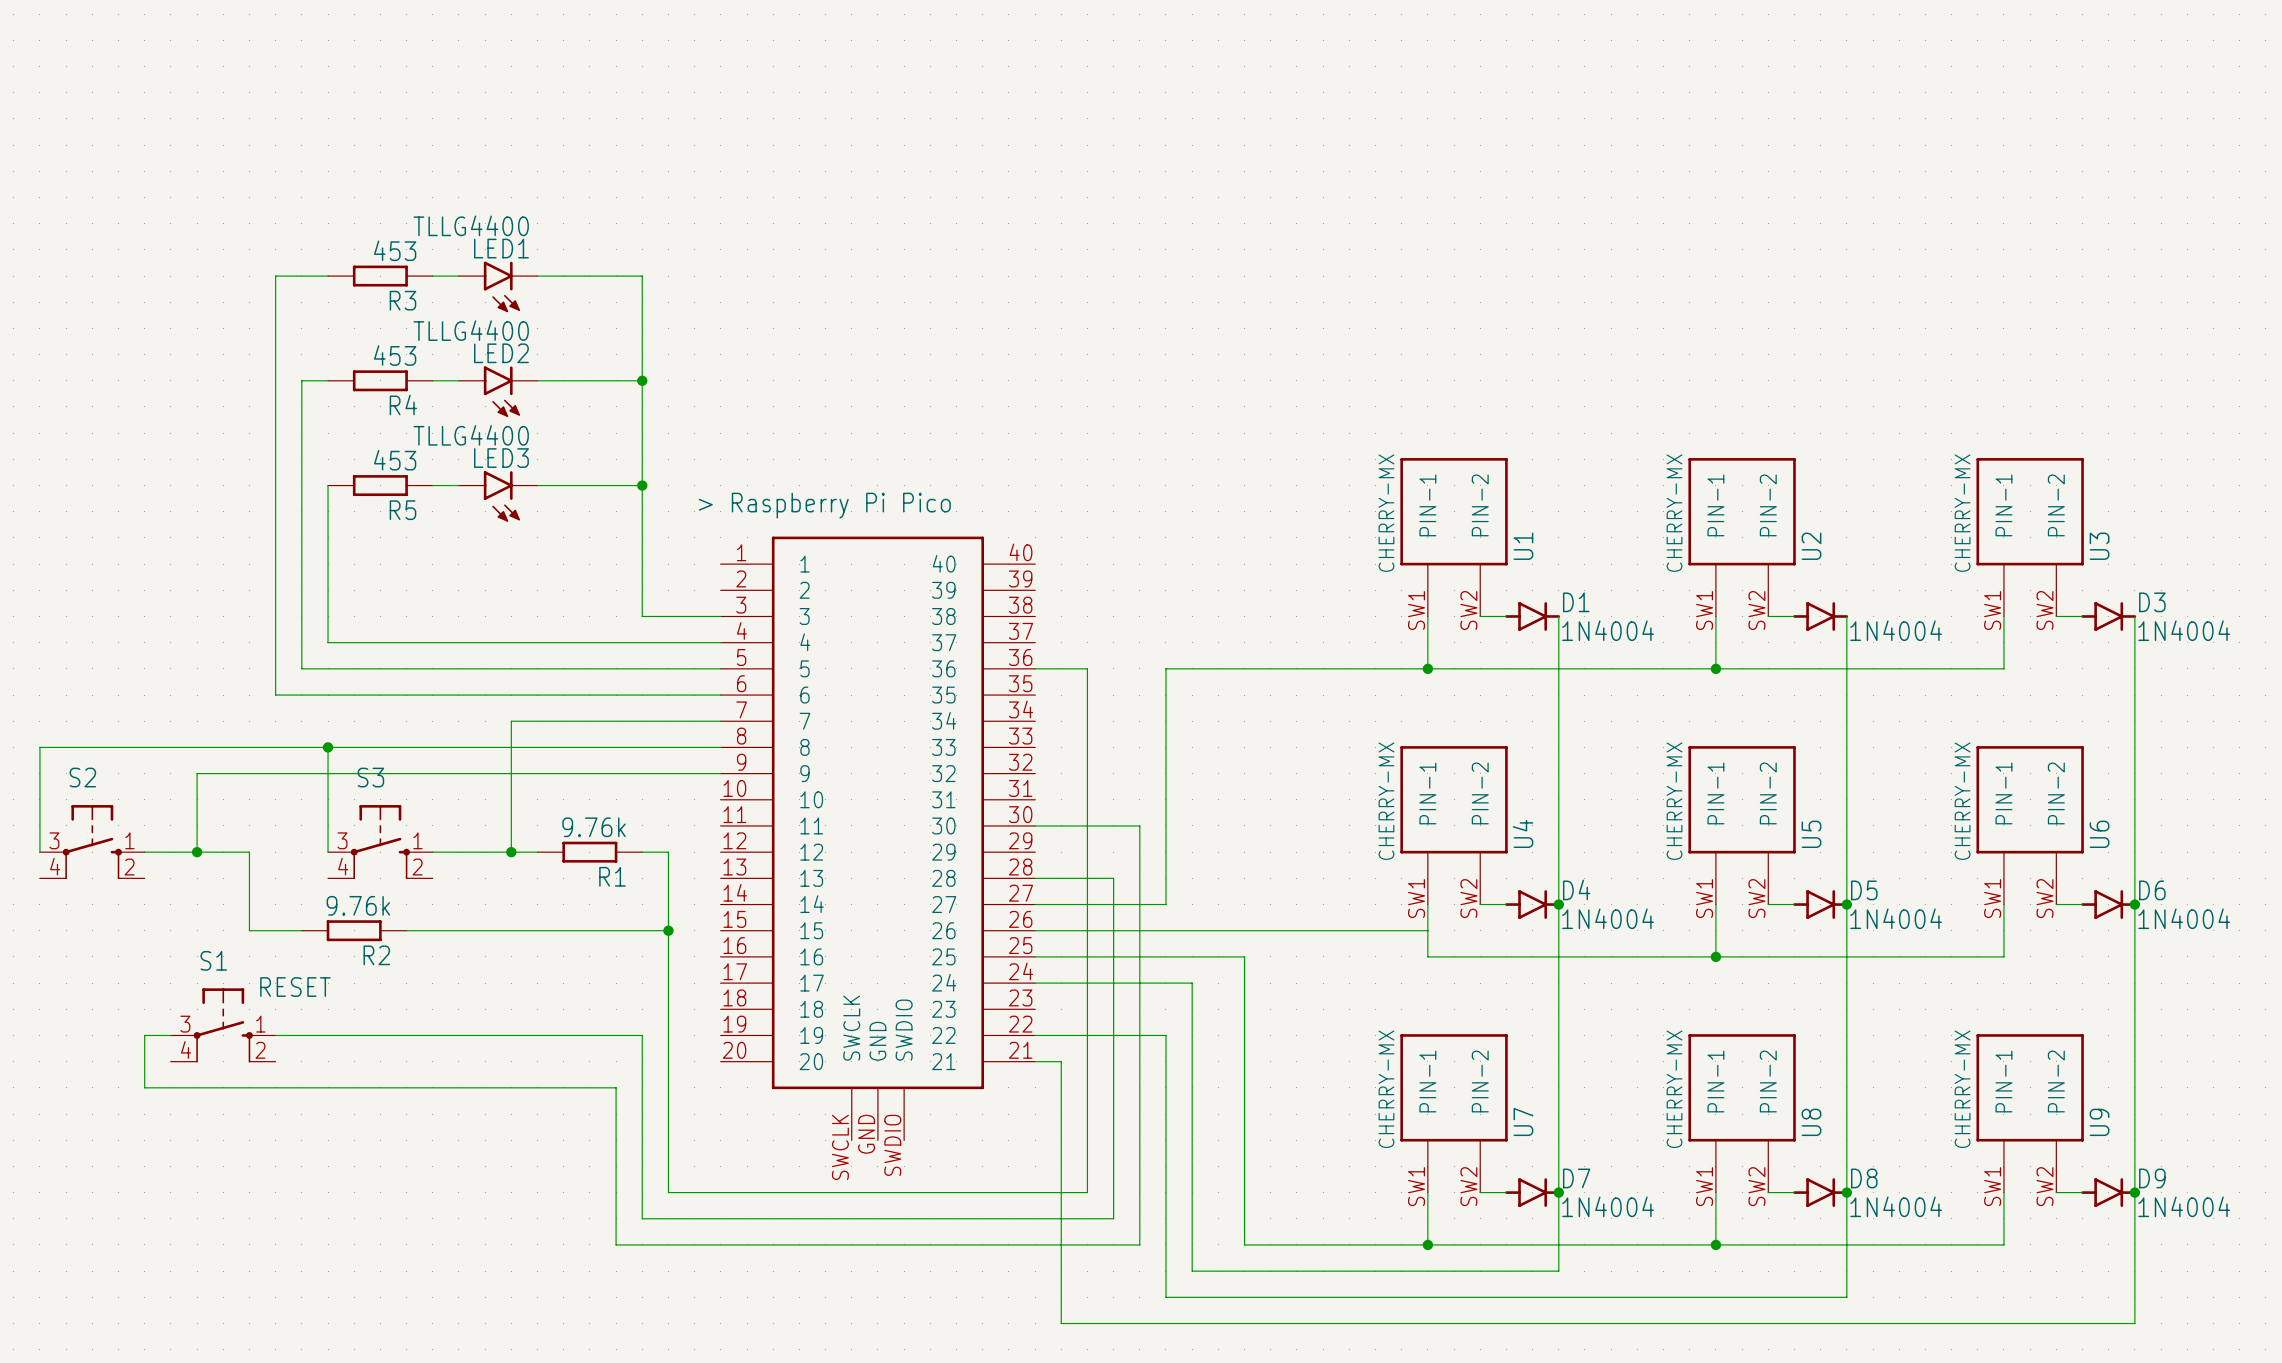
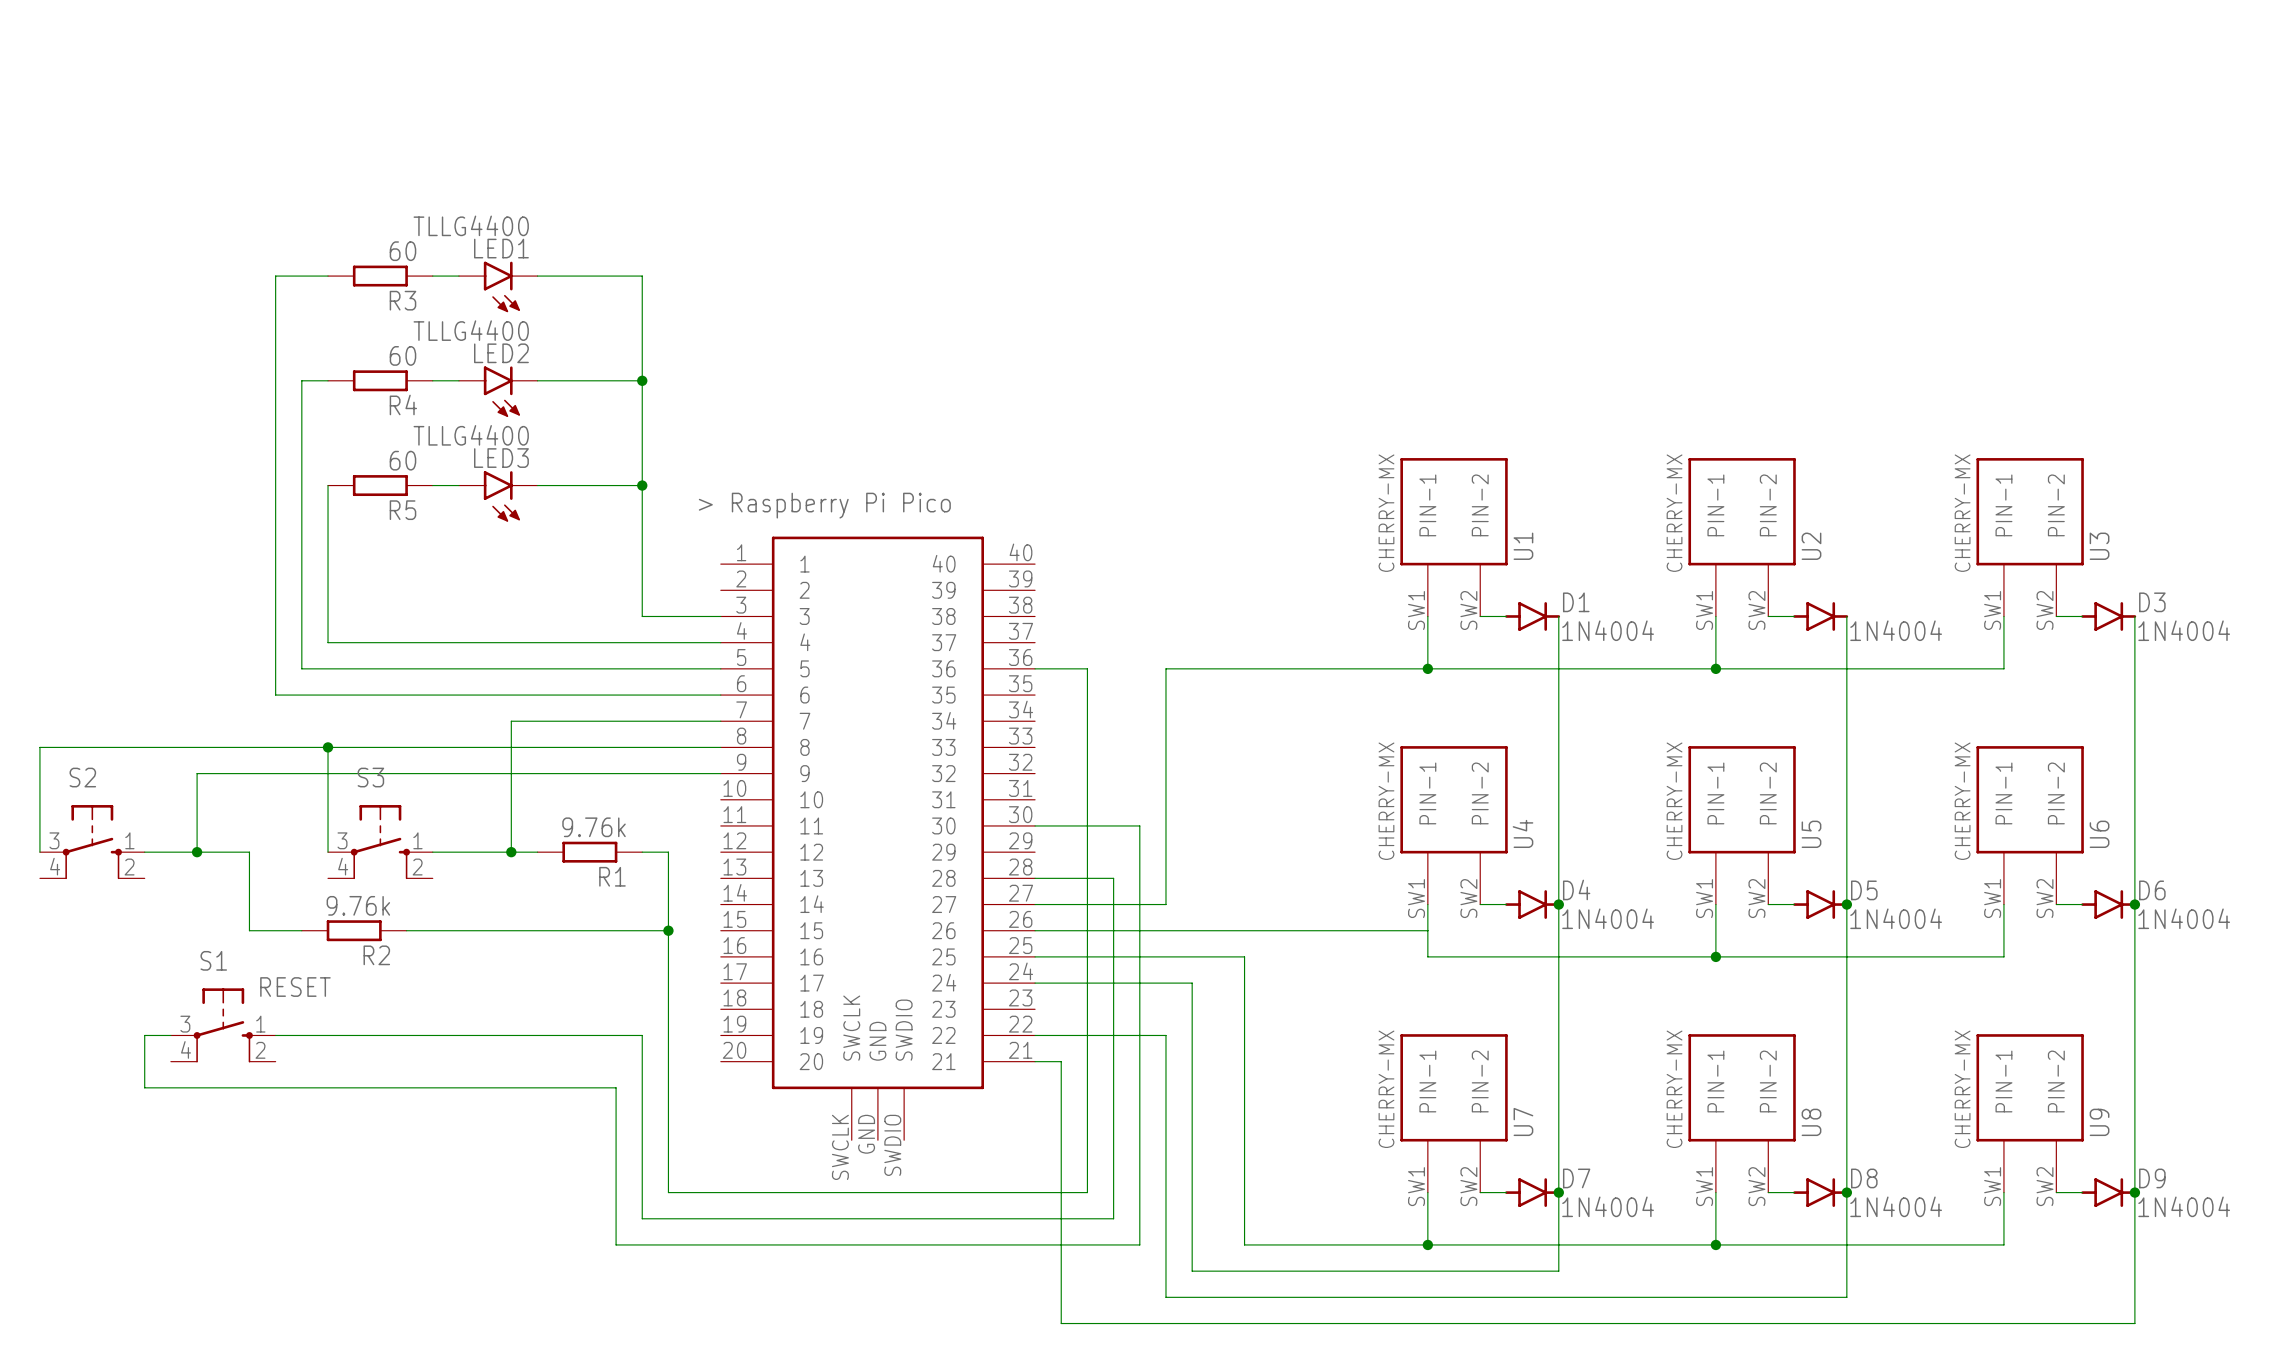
R3 value: 453 (395, 250) -> 60 (402, 251)
R4 value: 453 (395, 355) -> 60 (402, 355)
R5 value: 453 (395, 460) -> 60 (402, 460)

